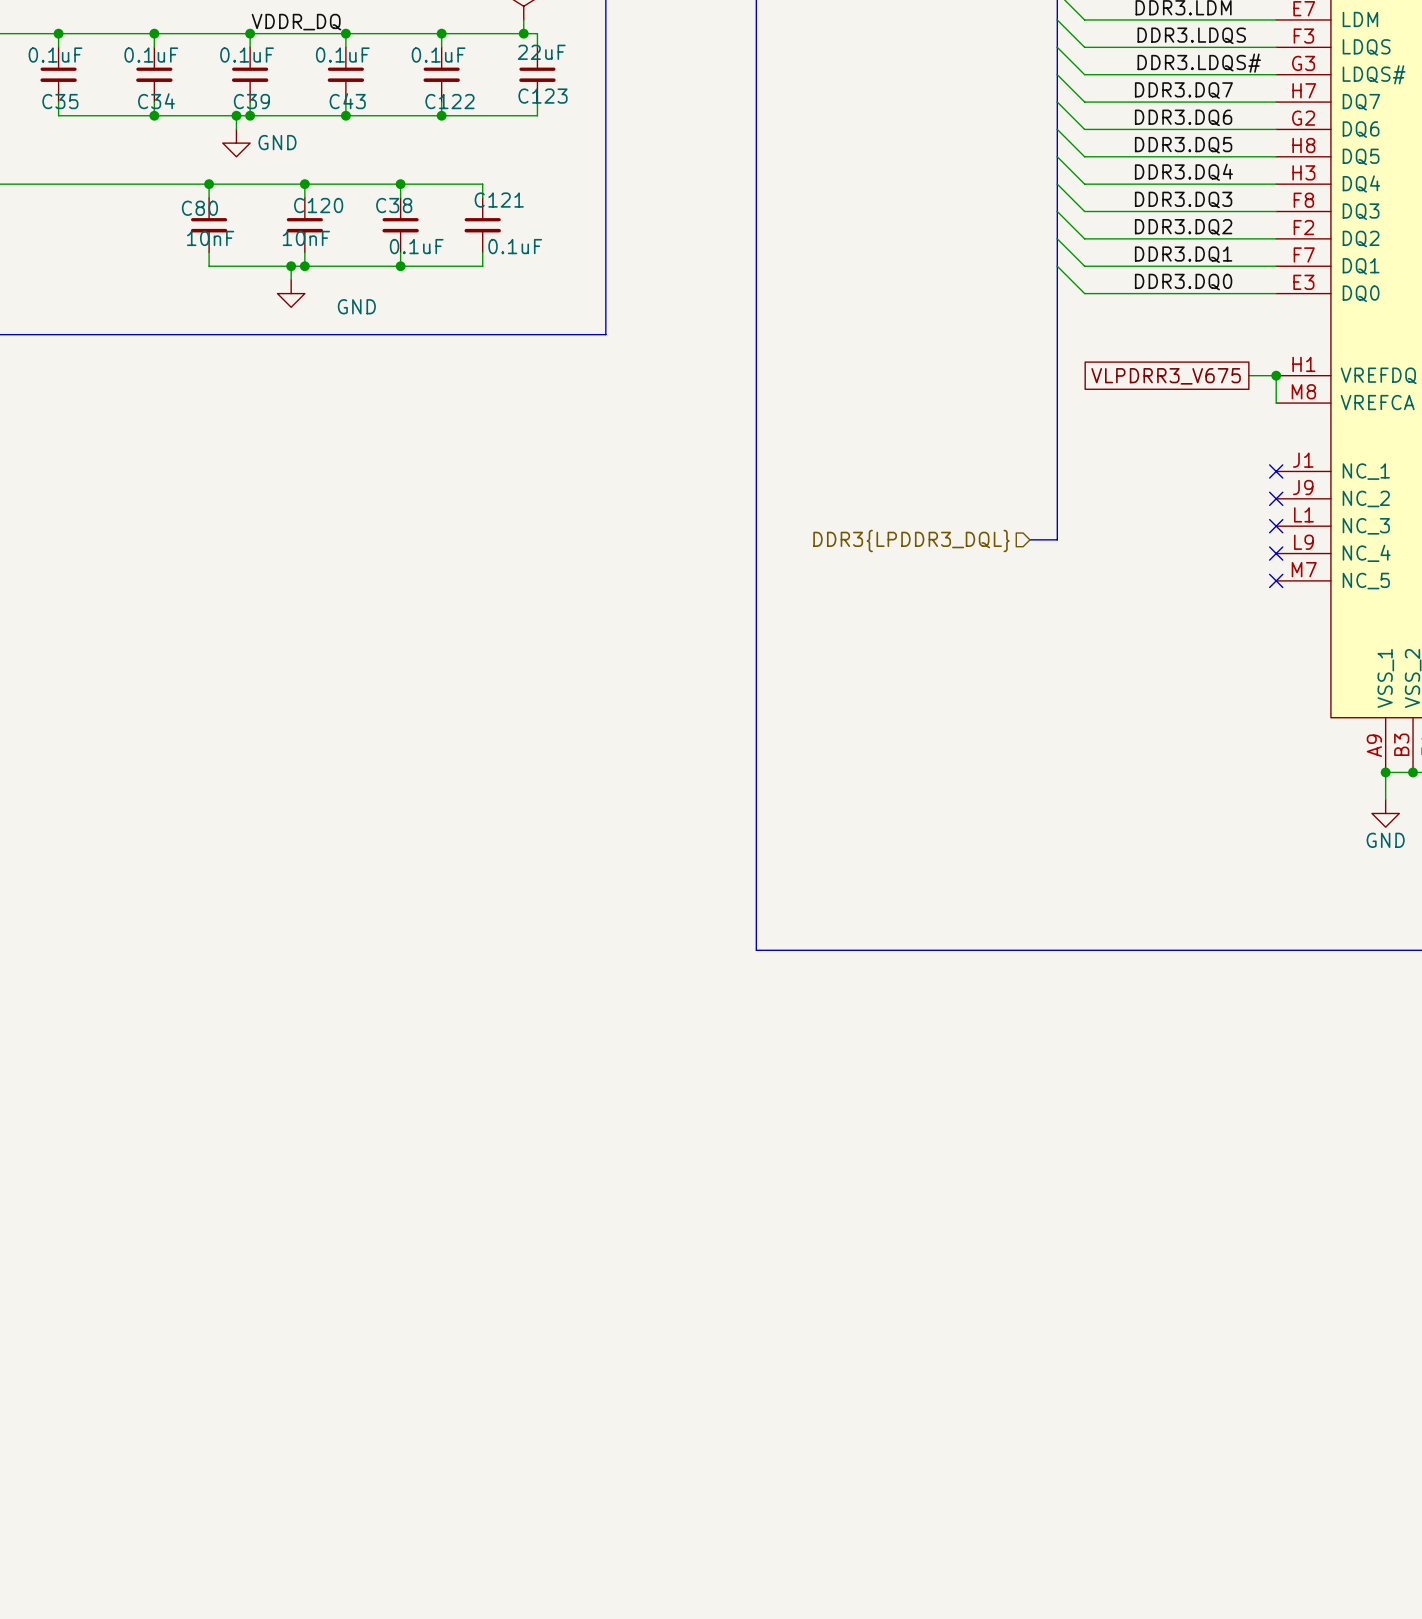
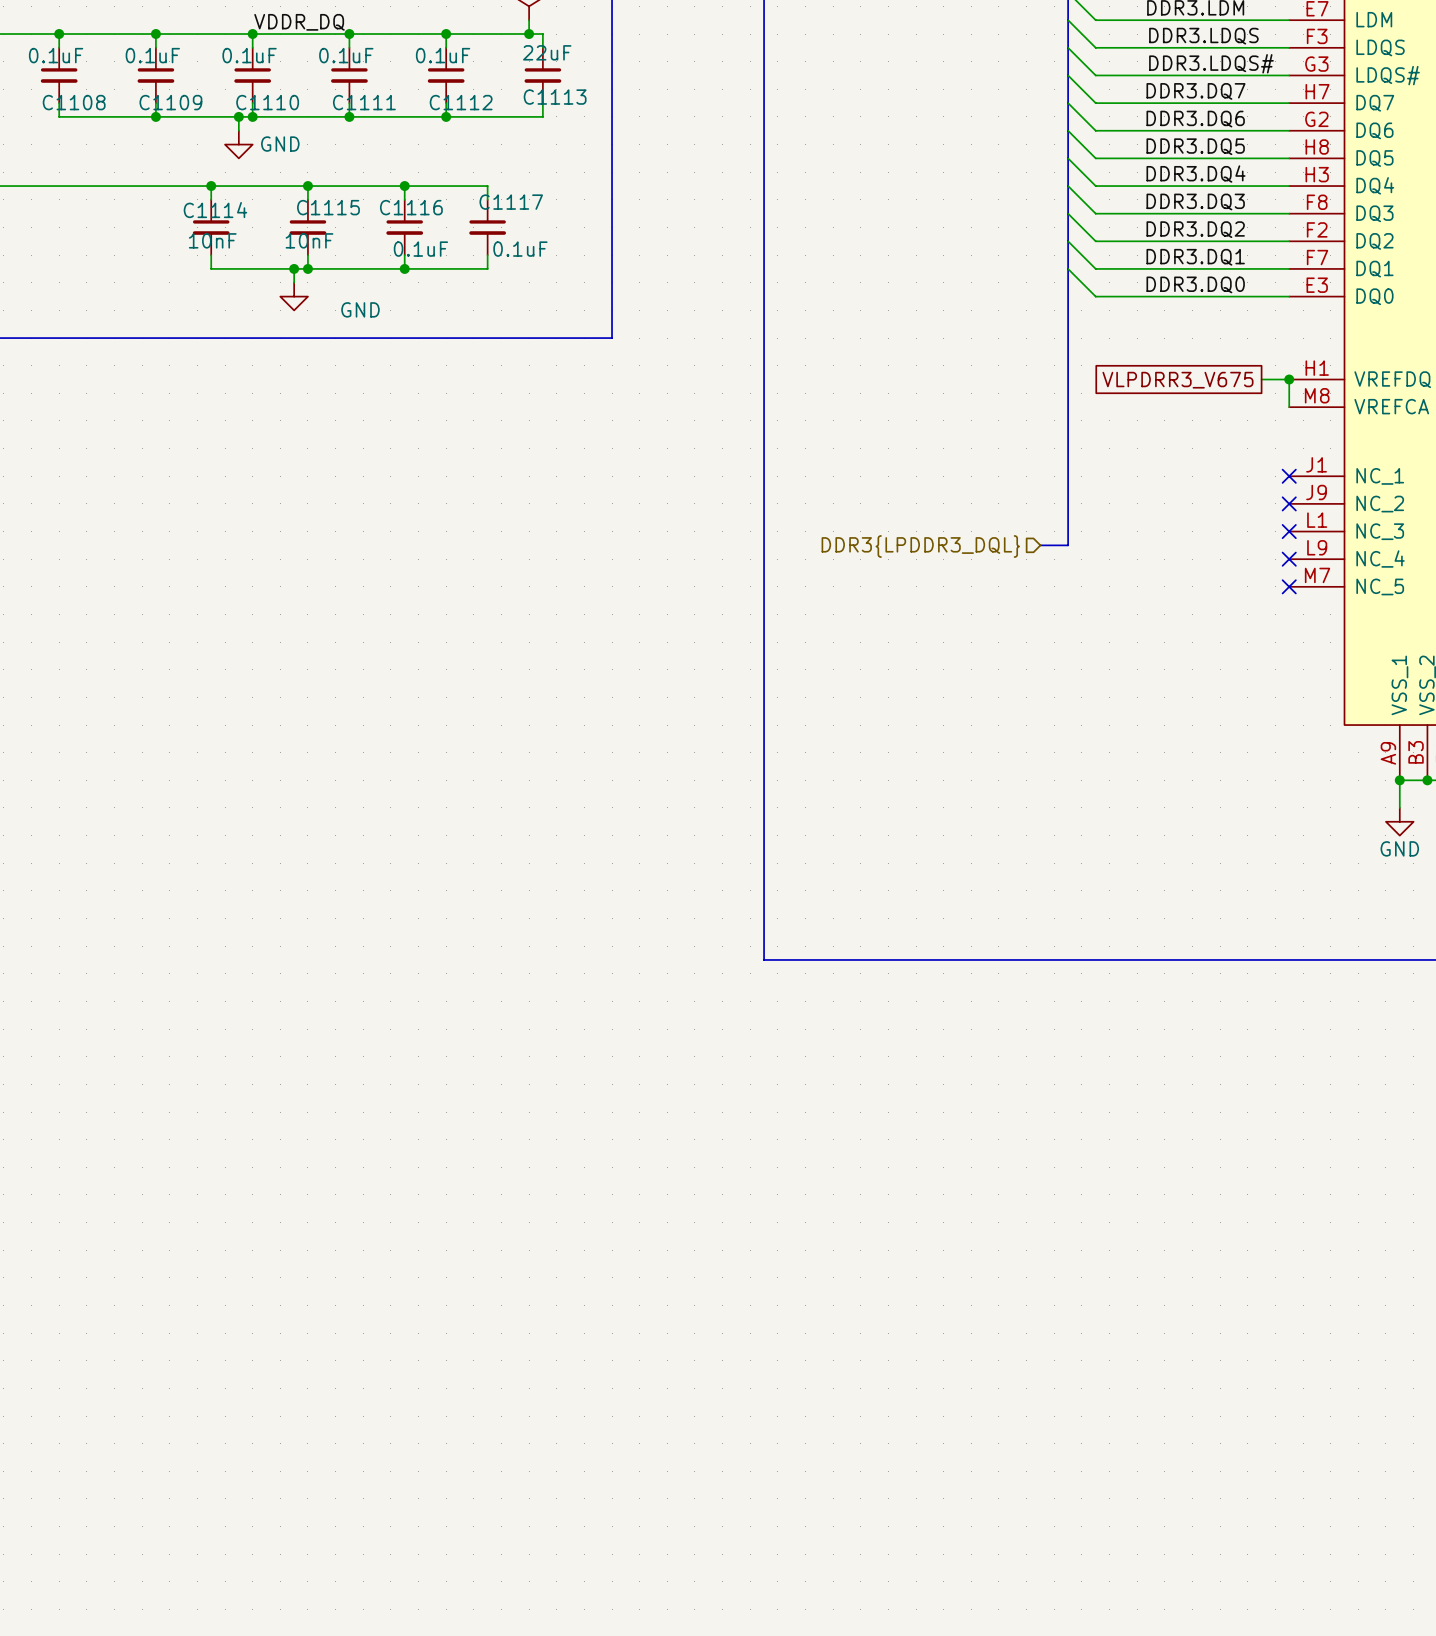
C123 name: C123 (543, 96) -> C1113 (555, 97)
C35 name: C35 (60, 101) -> C1108 (74, 102)
C34 name: C34 (156, 101) -> C1109 (170, 102)
C39 name: C39 (251, 101) -> C1110 (267, 102)
C43 name: C43 (347, 101) -> C1111 (364, 102)
C122 name: C122 (449, 101) -> C1112 (461, 102)
C121 name: C121 (499, 200) -> C1117 (511, 202)
C120 name: C120 (318, 205) -> C1115 (328, 207)
C38 name: C38 (394, 205) -> C1116 (411, 207)
C80 name: C80 (199, 208) -> C1114 (215, 210)

